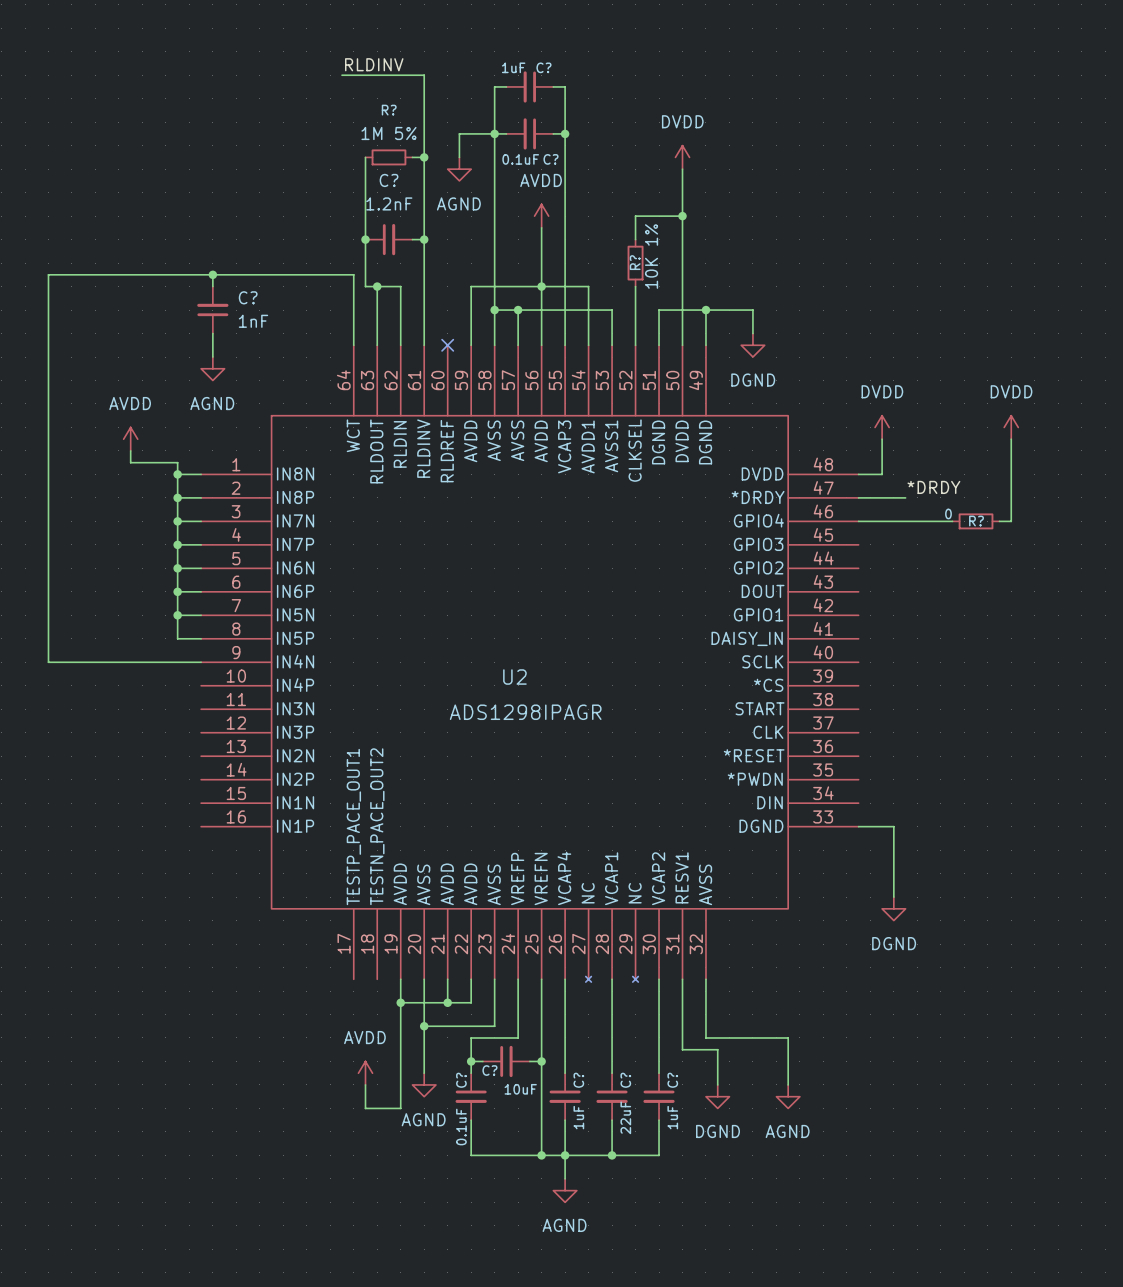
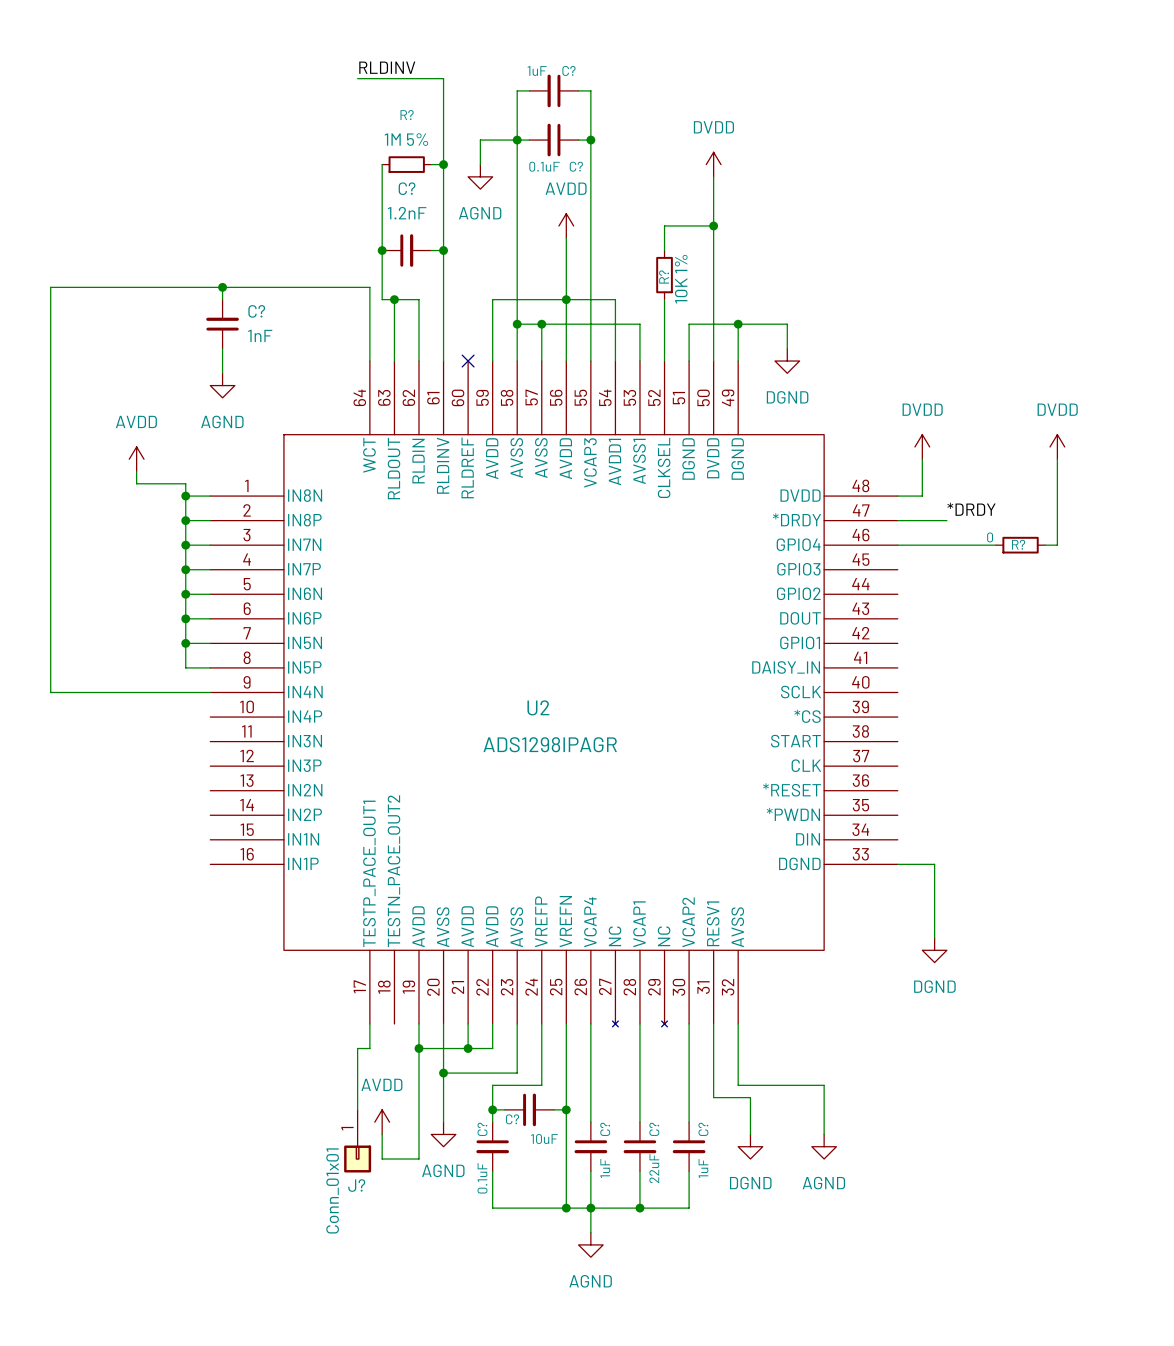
wire: none -> (369, 1023) (369, 1048) (357, 1048) (357, 1109)
J?: none -> Conn_01x01 (357, 1141)

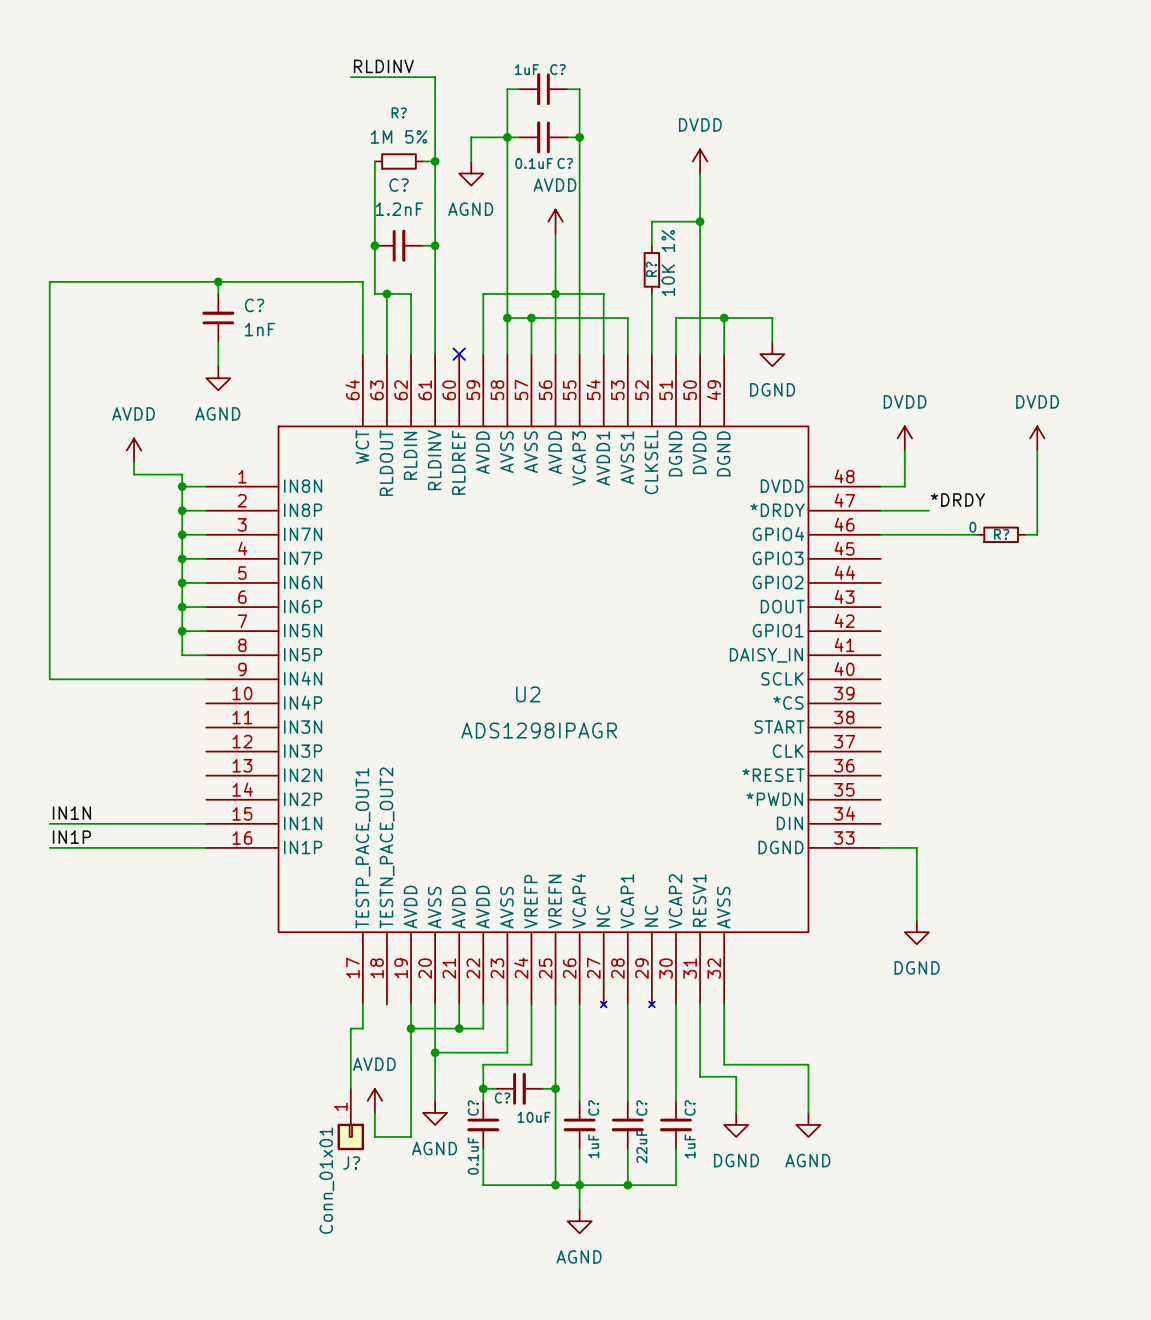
label: none -> IN1N (71, 813)
wire: none -> (49, 823) (206, 823)
label: none -> IN1P (71, 837)
wire: none -> (49, 847) (206, 847)

